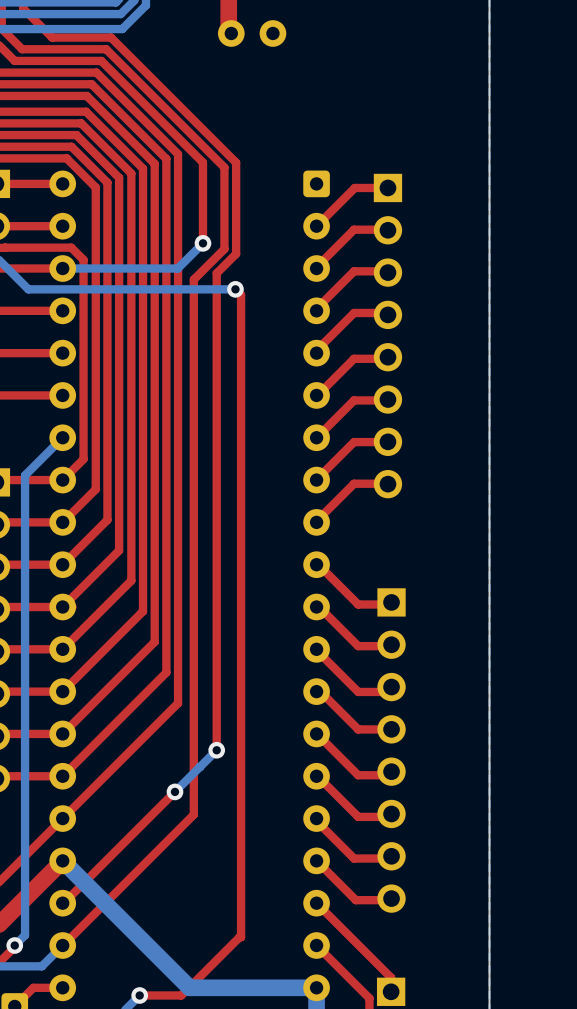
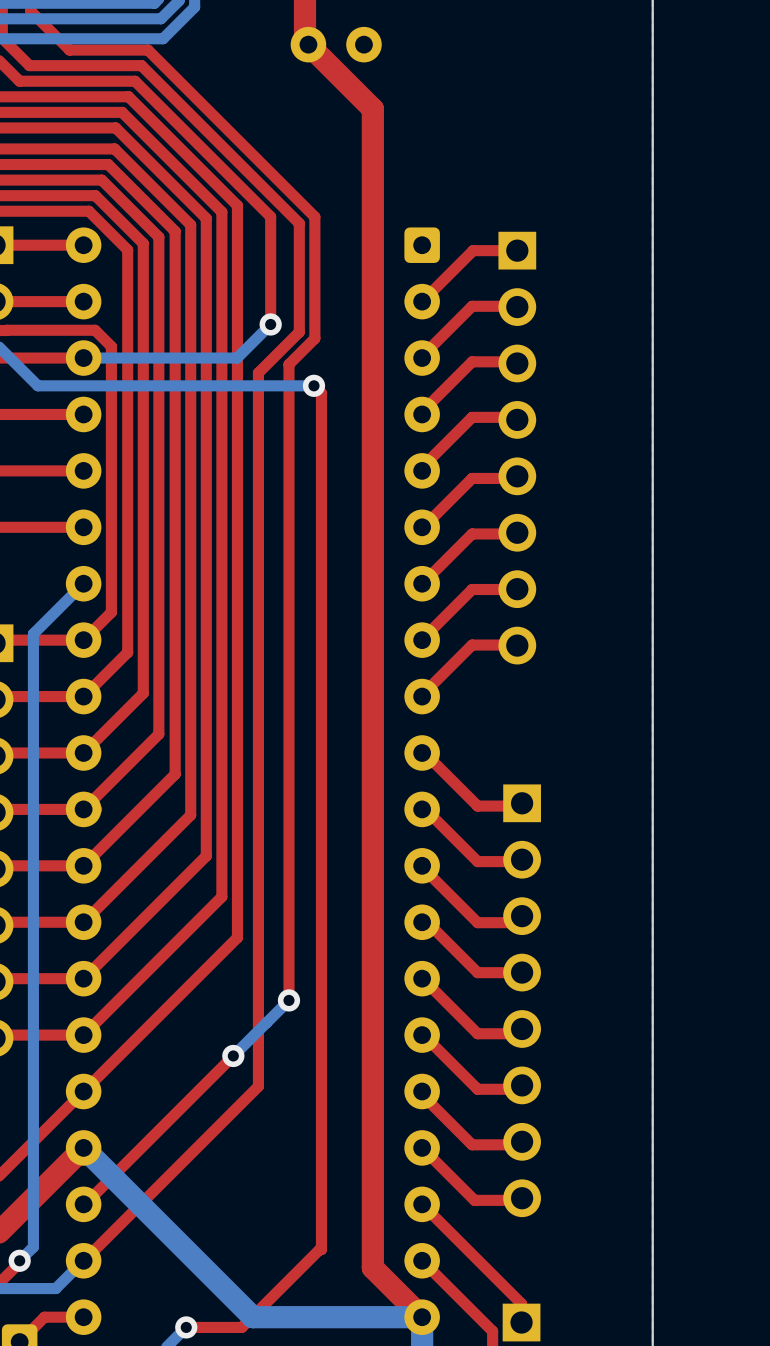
top track: none -> (308, 44) (372, 109) (372, 1267) (422, 1317)

